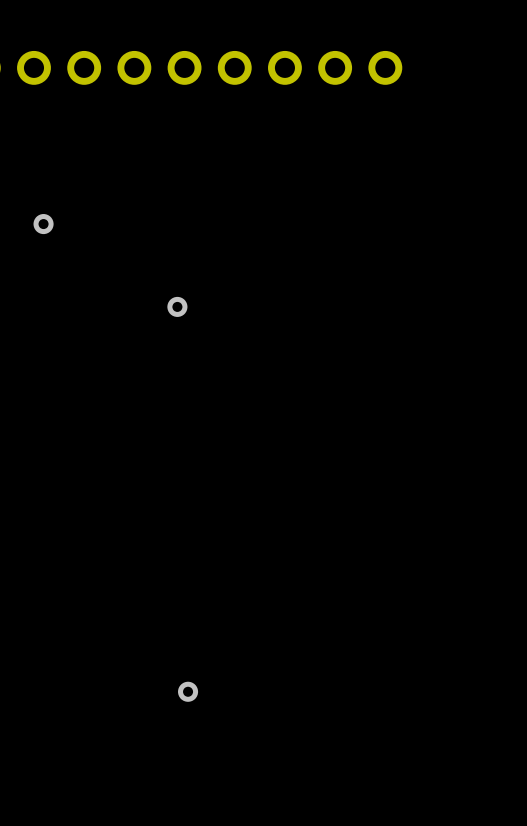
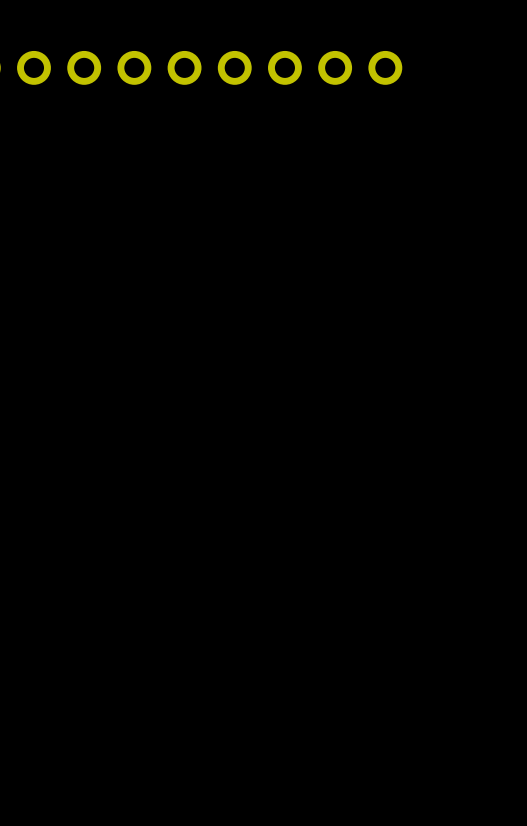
via: (43, 224) -> none
via: (177, 306) -> none
via: (188, 691) -> none

